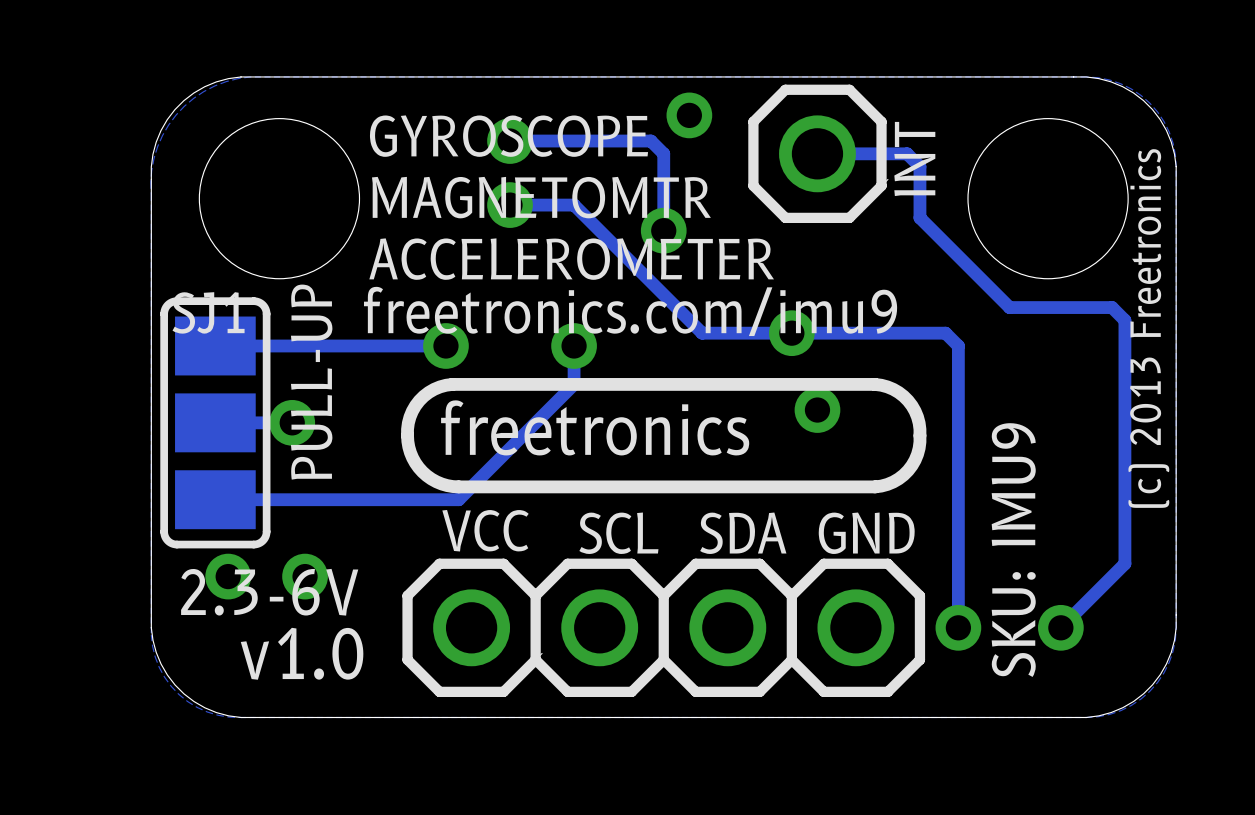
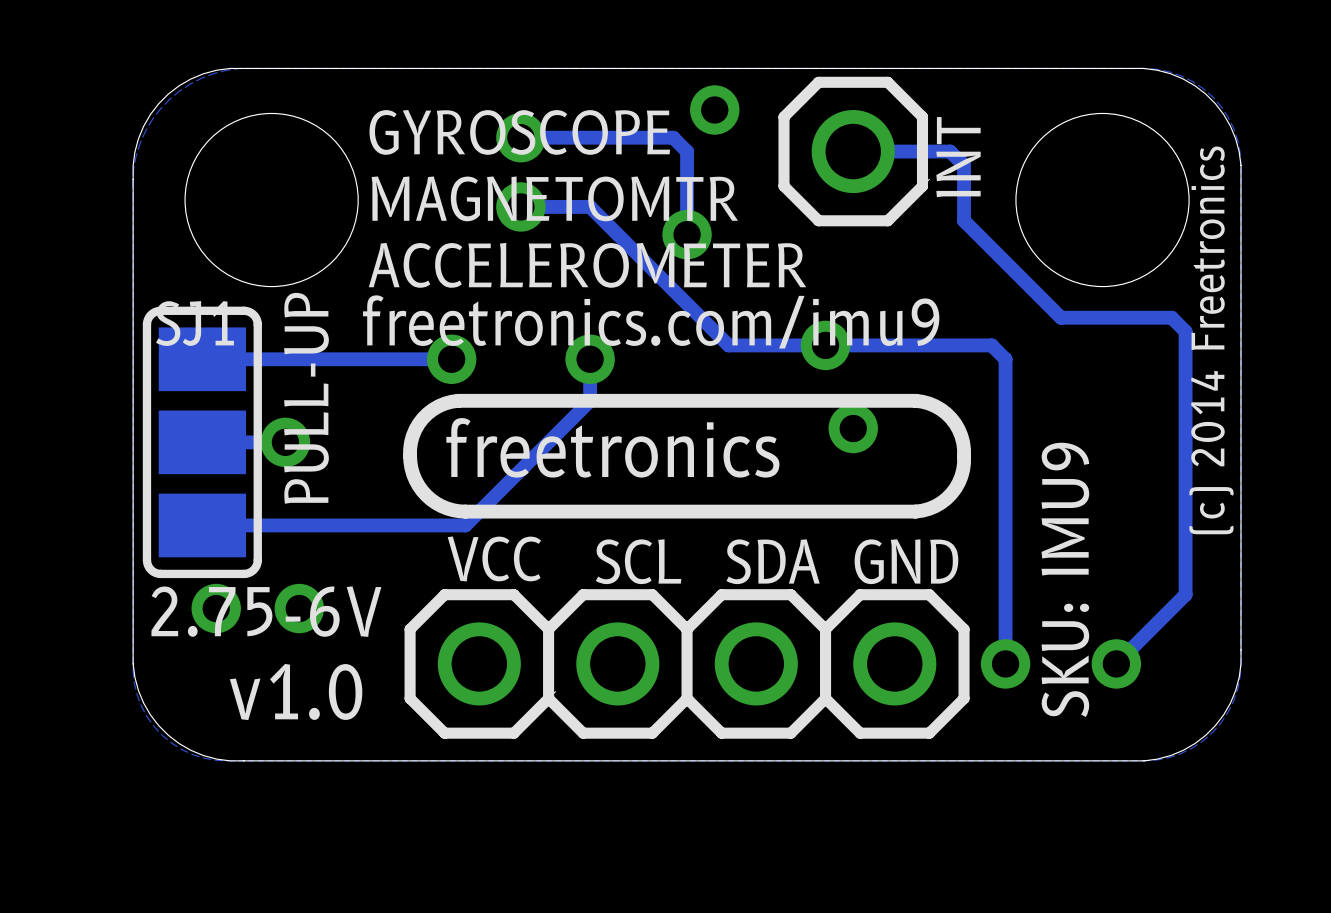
text: (c) 2013 Freetronics (1148, 328) -> (c) 2014 Freetronics (1211, 340)
text: 2.3-6V (269, 592) -> 2.75-6V (266, 611)

